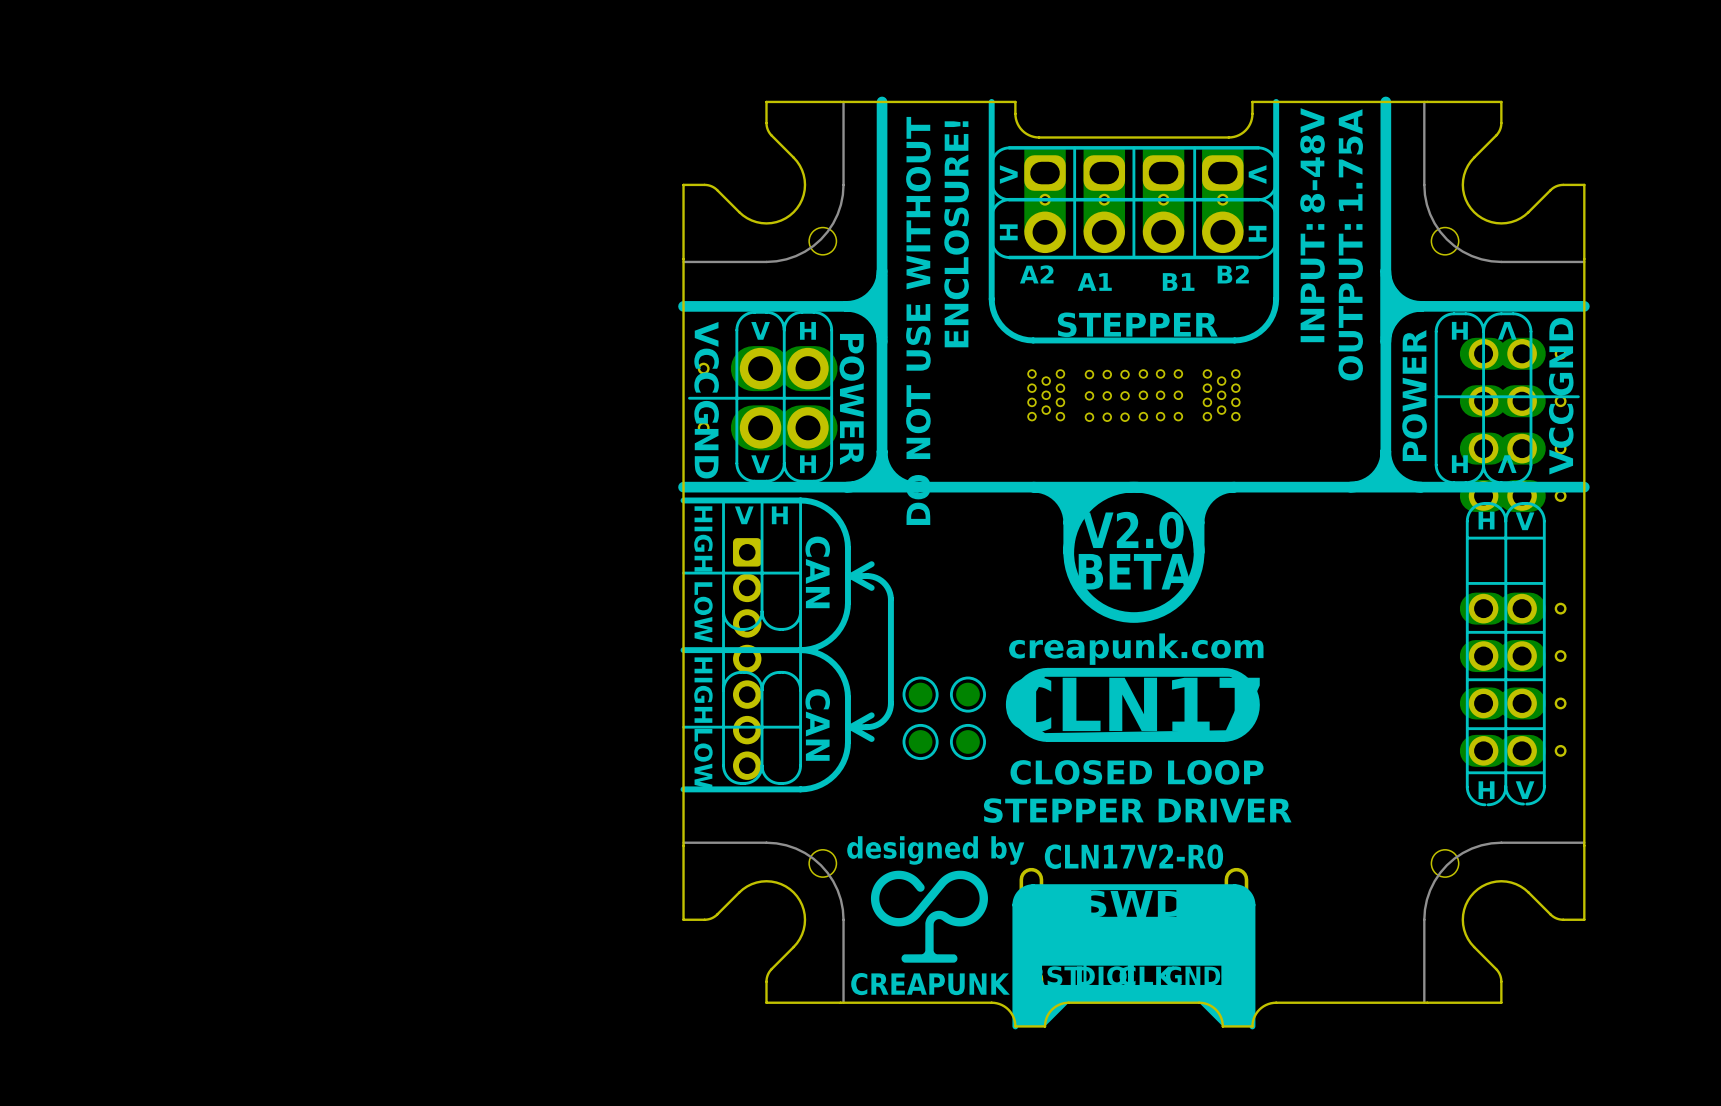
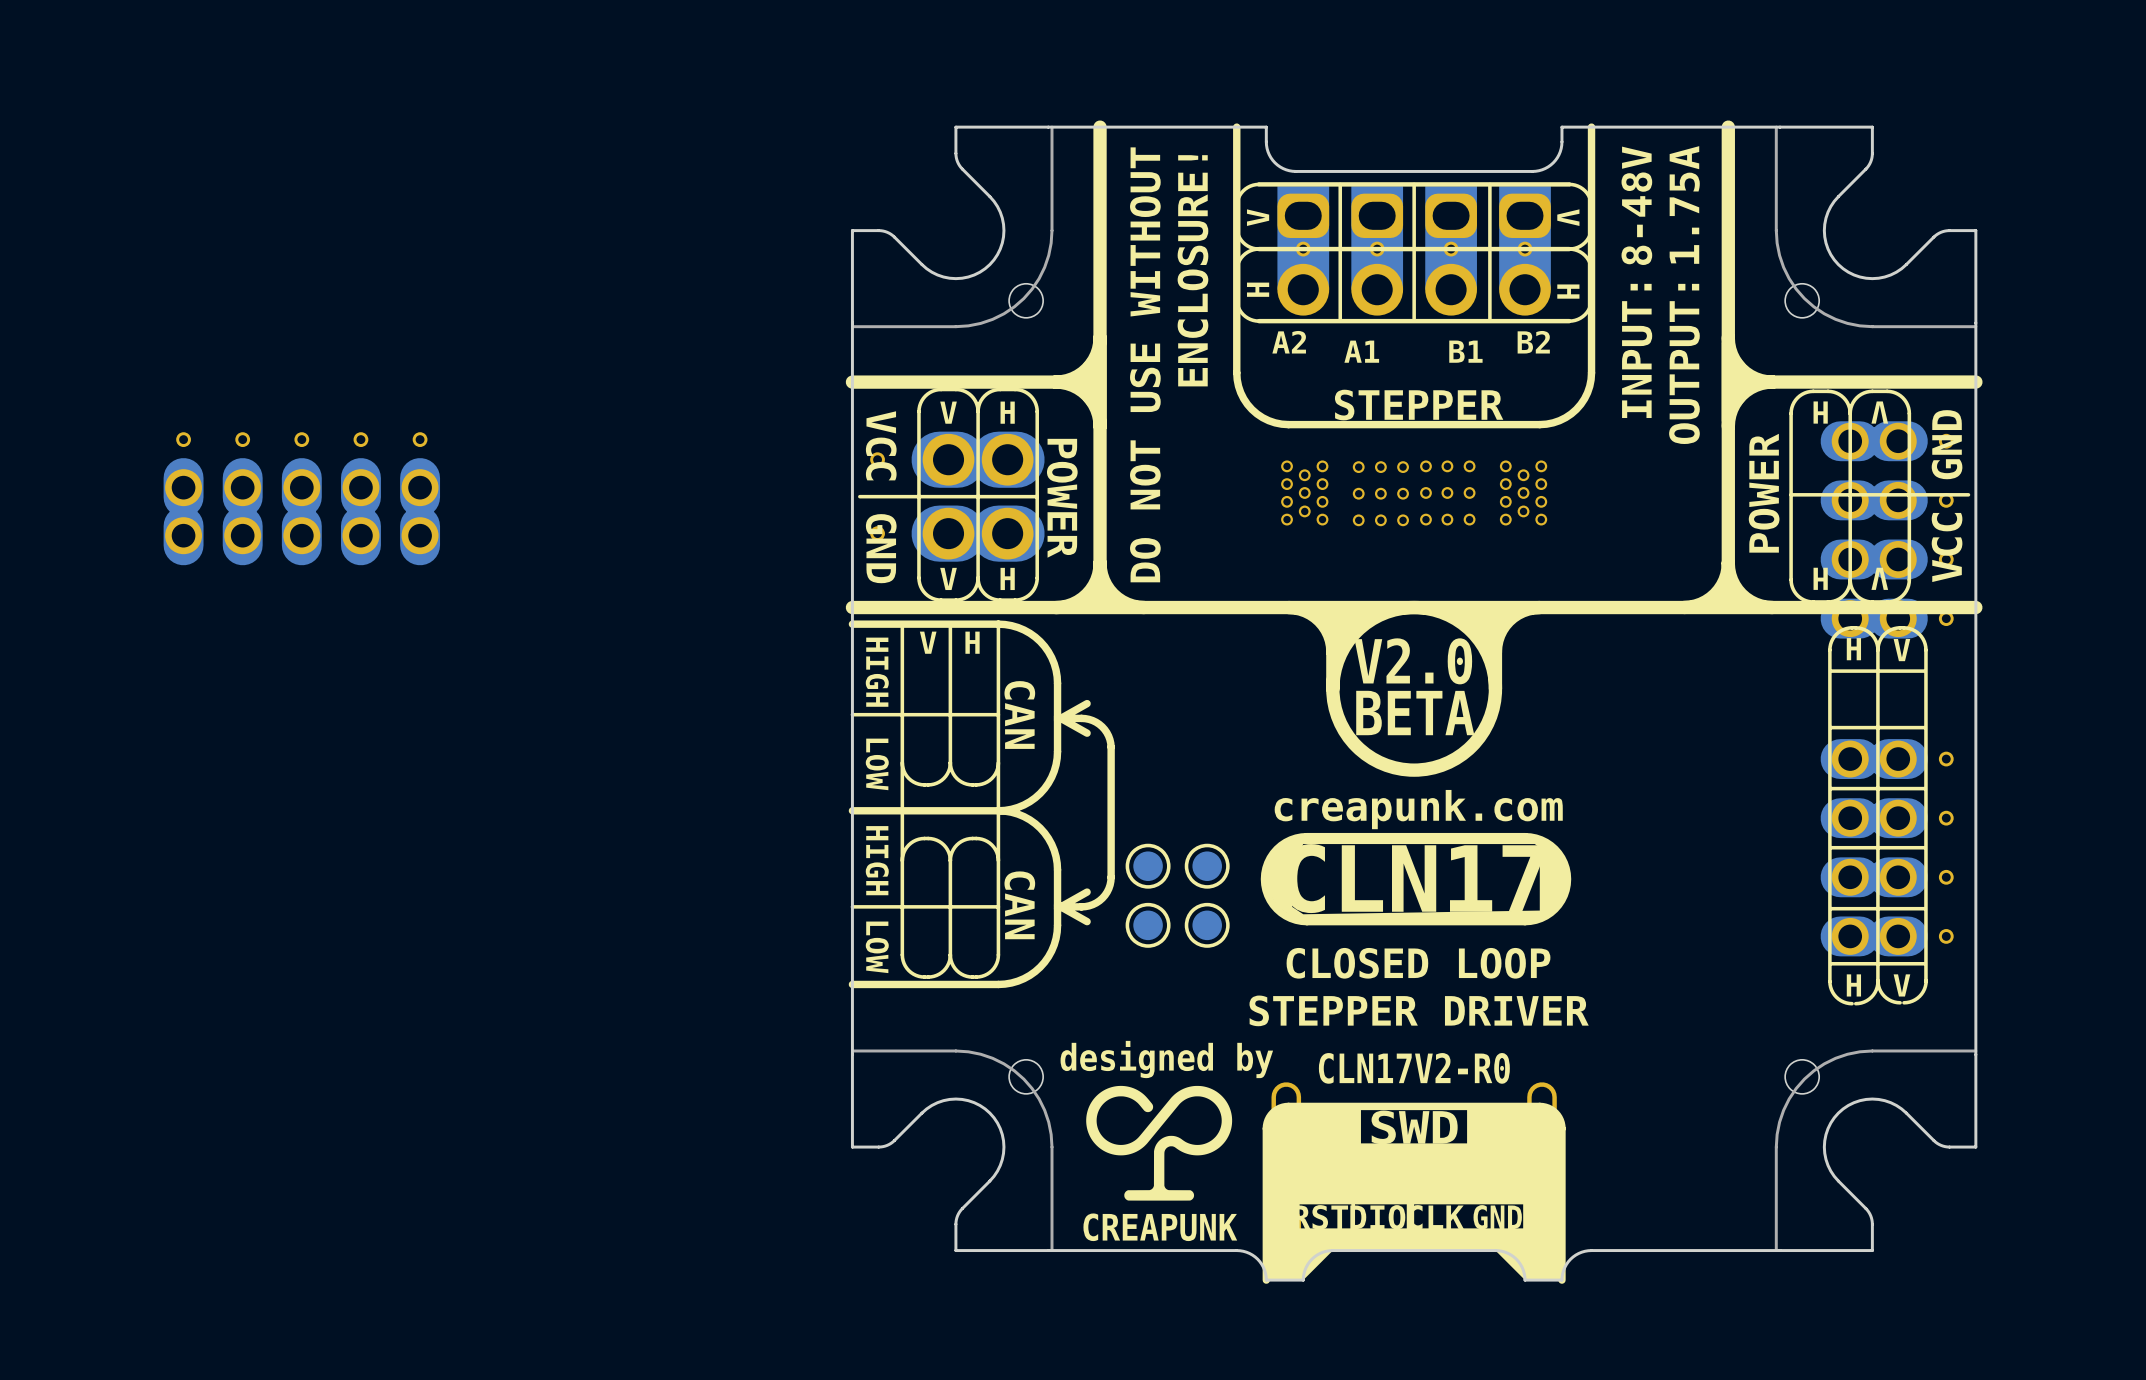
part: none -> (301, 498)
part: (747, 659) -> none

